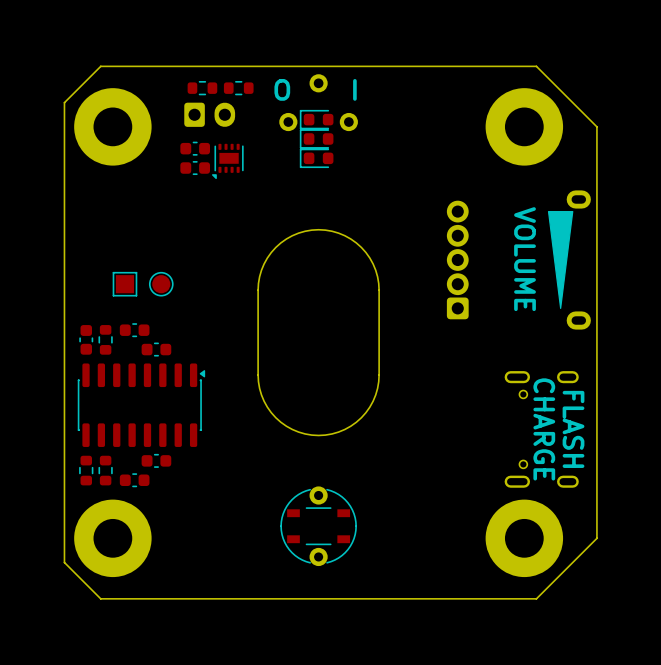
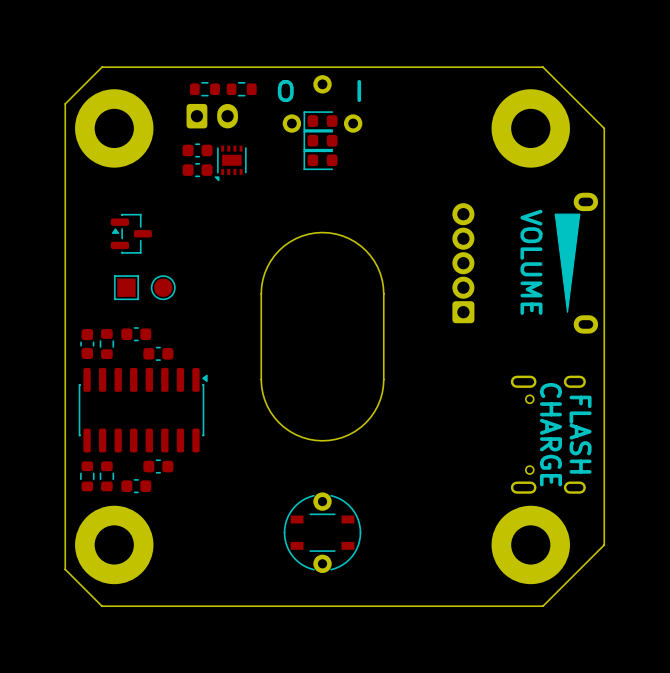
part: none -> (131, 233)

